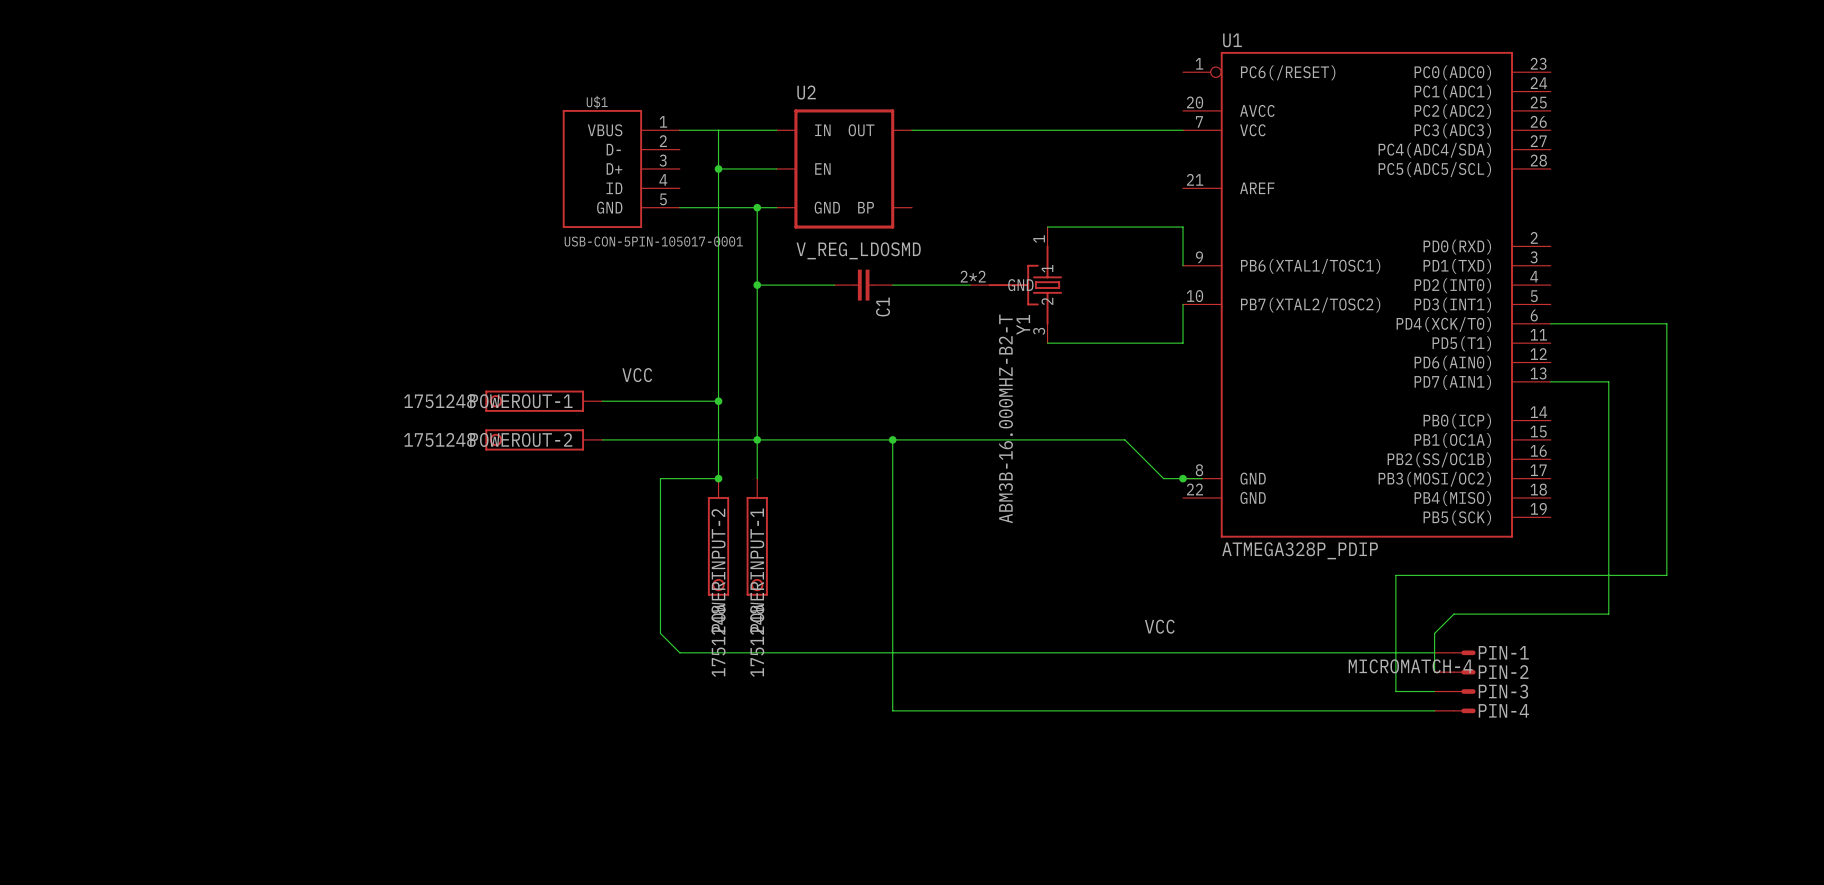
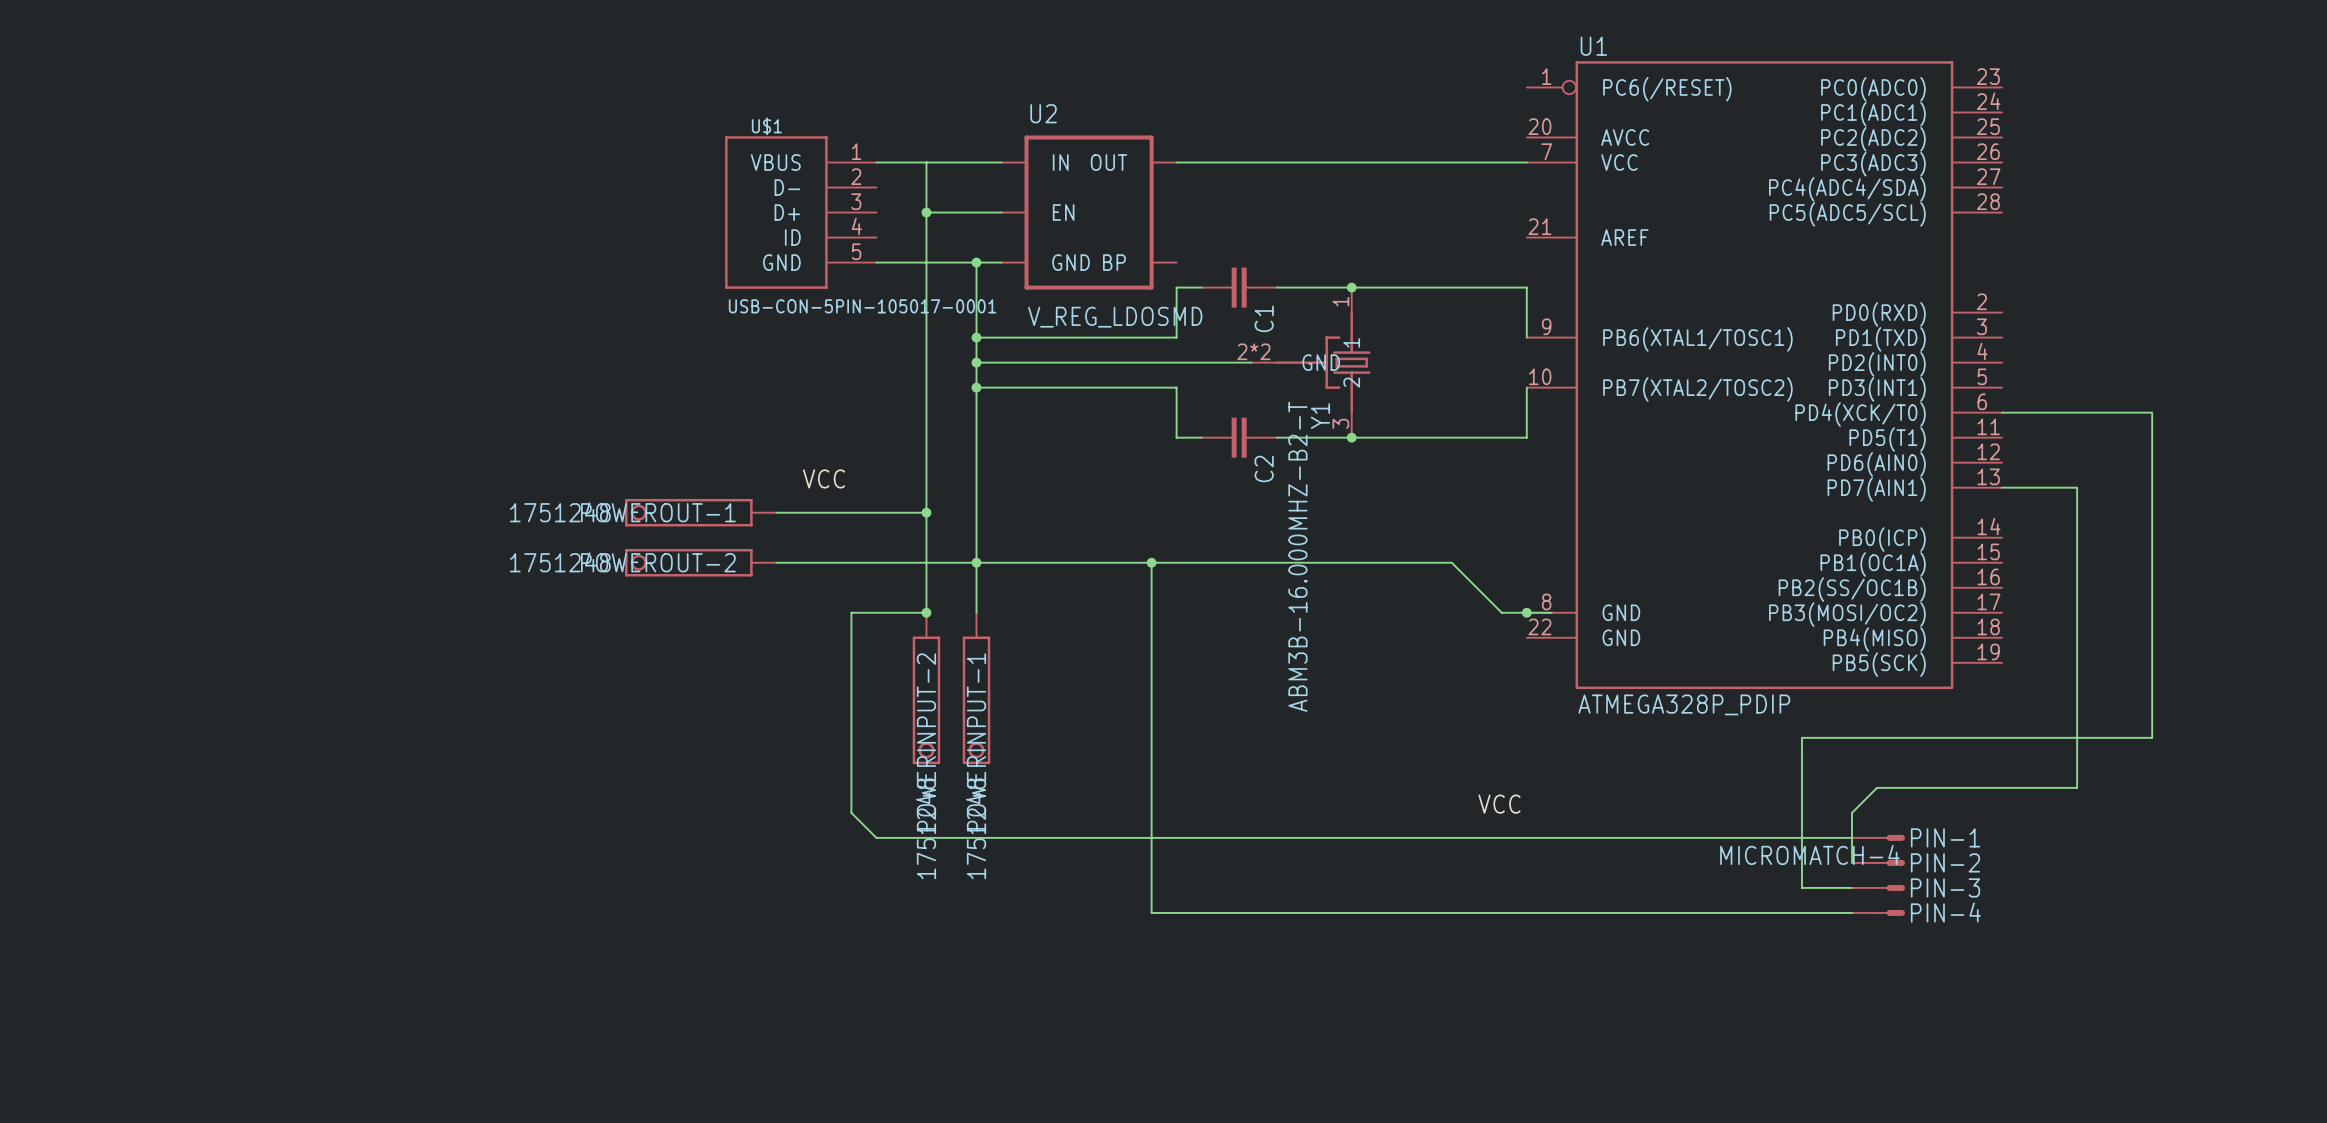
wire: none -> (1201, 287) (1176, 287) (1176, 337) (976, 337)
wire: none -> (1276, 287) (1351, 287)
junction: none -> (1351, 287)
junction: none -> (976, 337)
C1 position: (863, 285) -> (1239, 287)
wire: none -> (976, 387) (1176, 387) (1176, 437) (1201, 437)
junction: none -> (976, 387)
C2: none -> (1239, 437)
wire: none -> (1276, 437) (1351, 437)
junction: none -> (1351, 437)

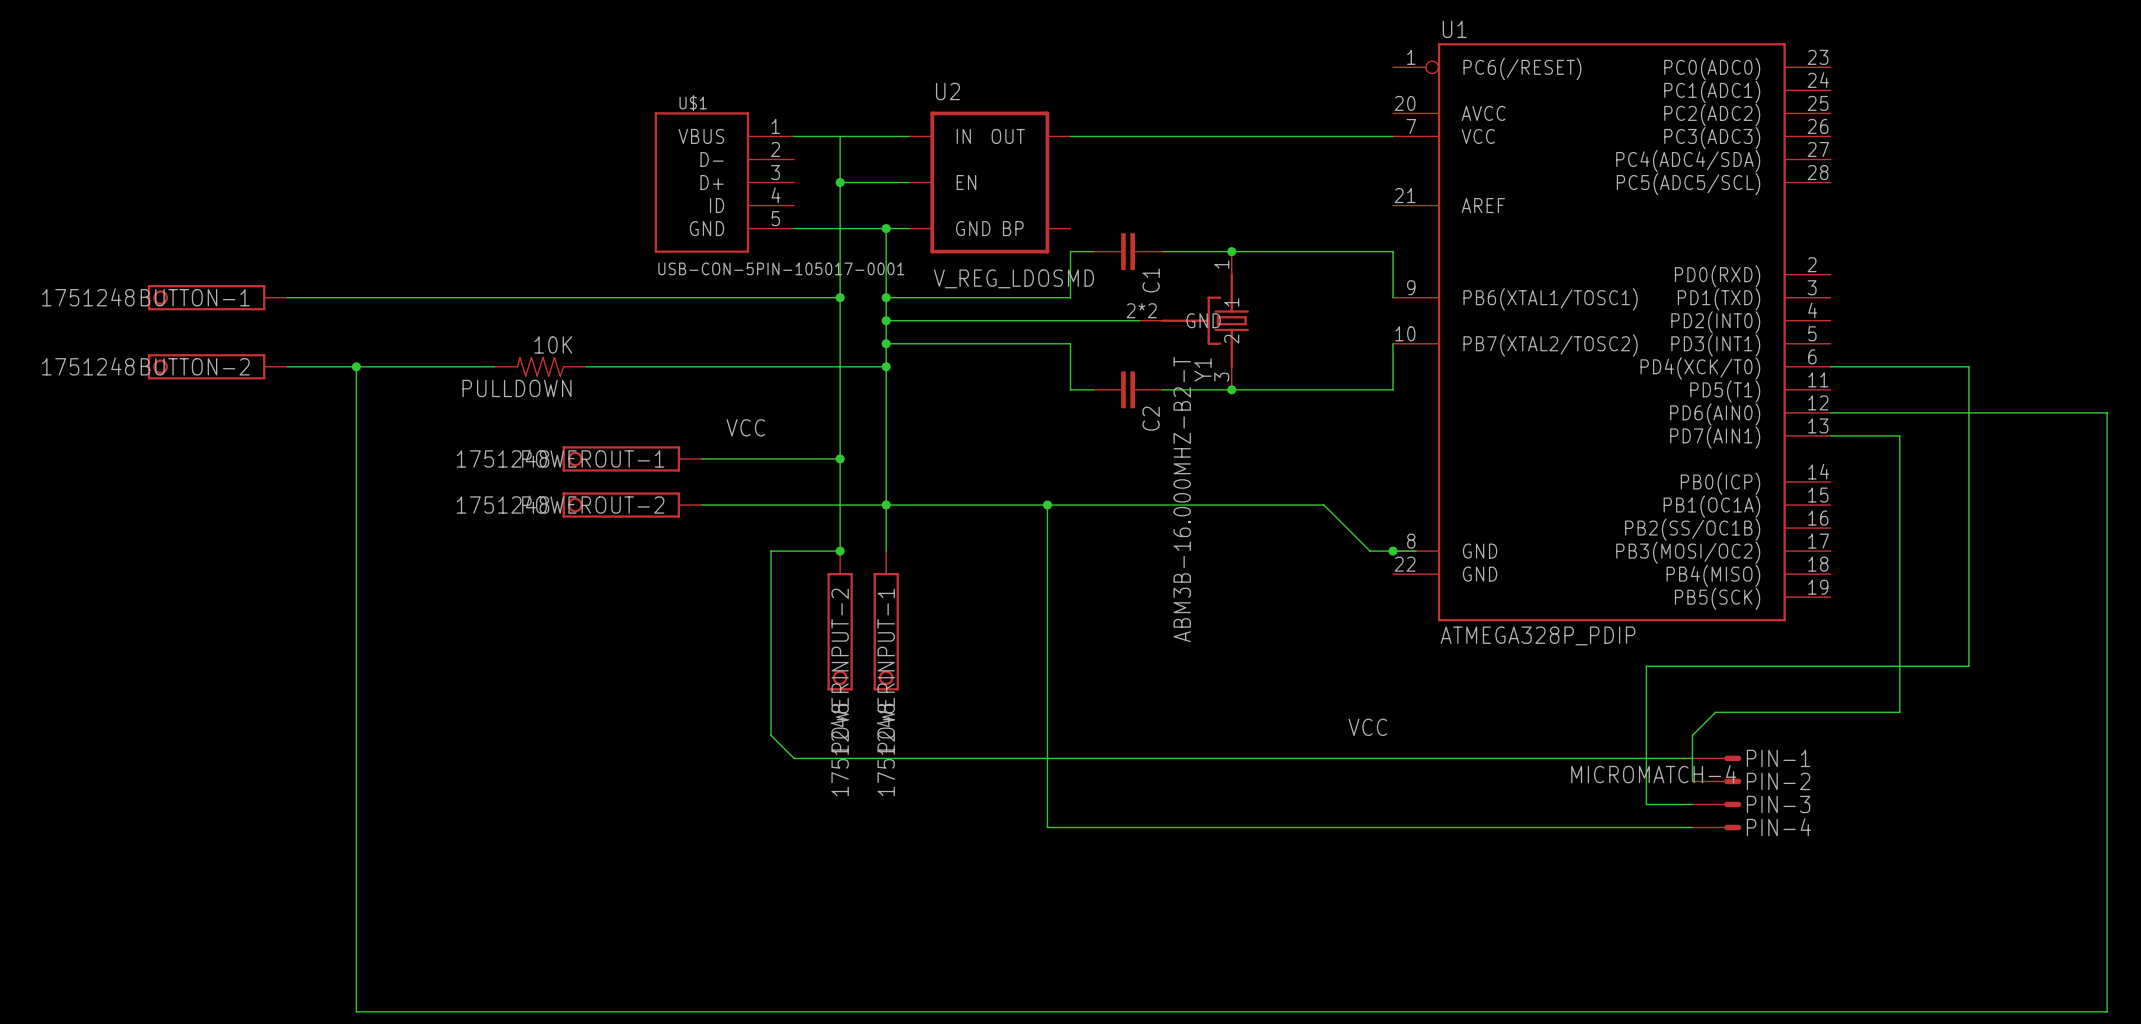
BUTTON-1: none -> 1751248 (217, 297)
wire: none -> (287, 297) (840, 297)
junction: none -> (840, 297)
BUTTON-2: none -> 1751248 (217, 366)
wire: none -> (287, 366) (494, 366)
wire: none -> (356, 366) (356, 1011) (2107, 1011) (2107, 412) (1830, 412)
junction: none -> (356, 366)
PULLDOWN: none -> 10K (540, 366)
wire: none -> (586, 366) (886, 366)
junction: none -> (886, 366)

